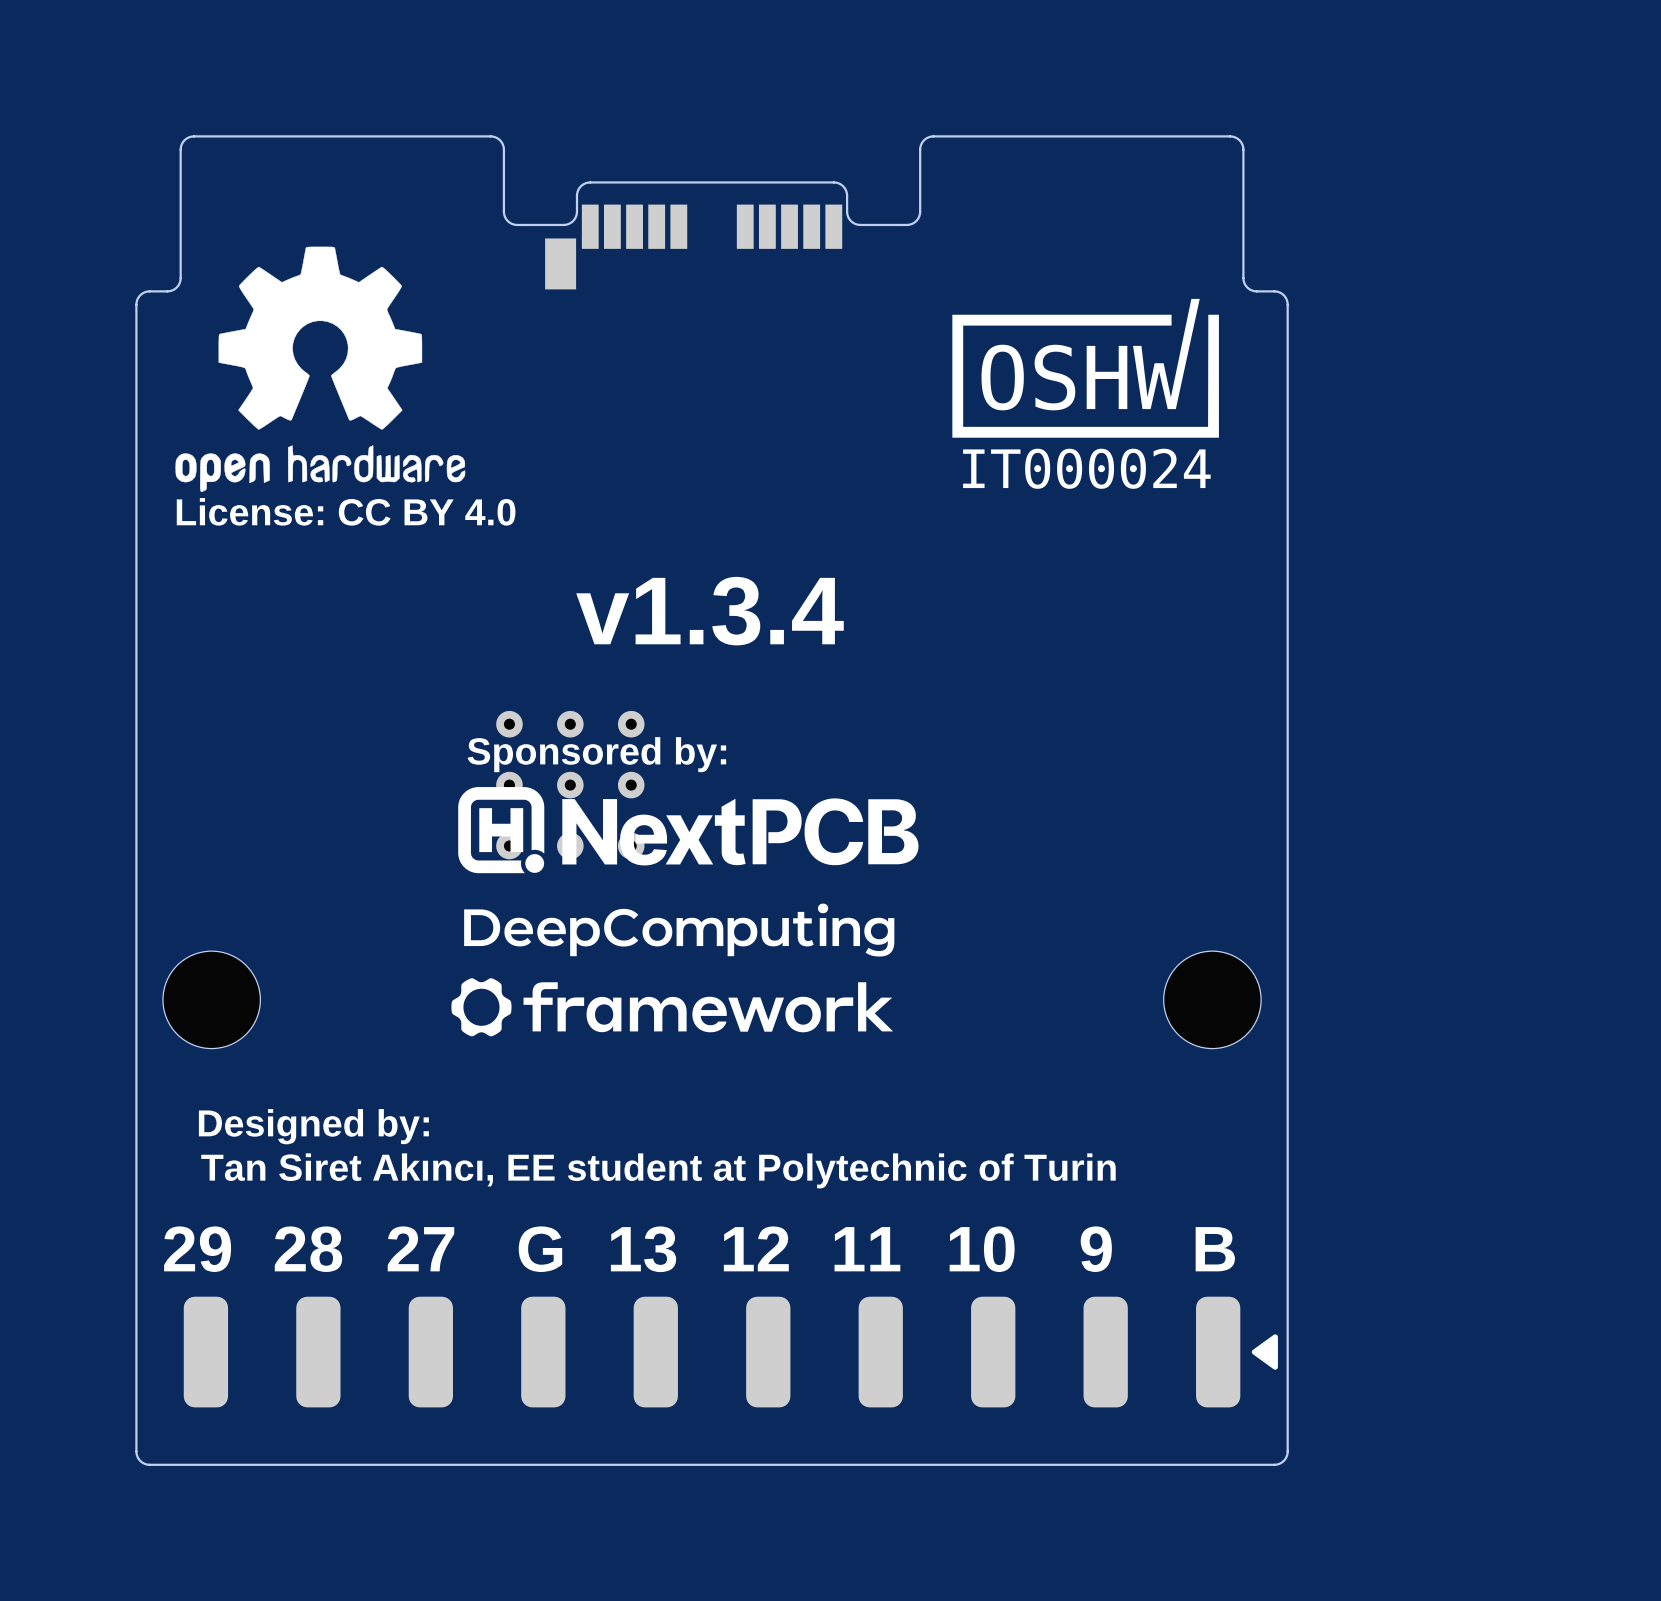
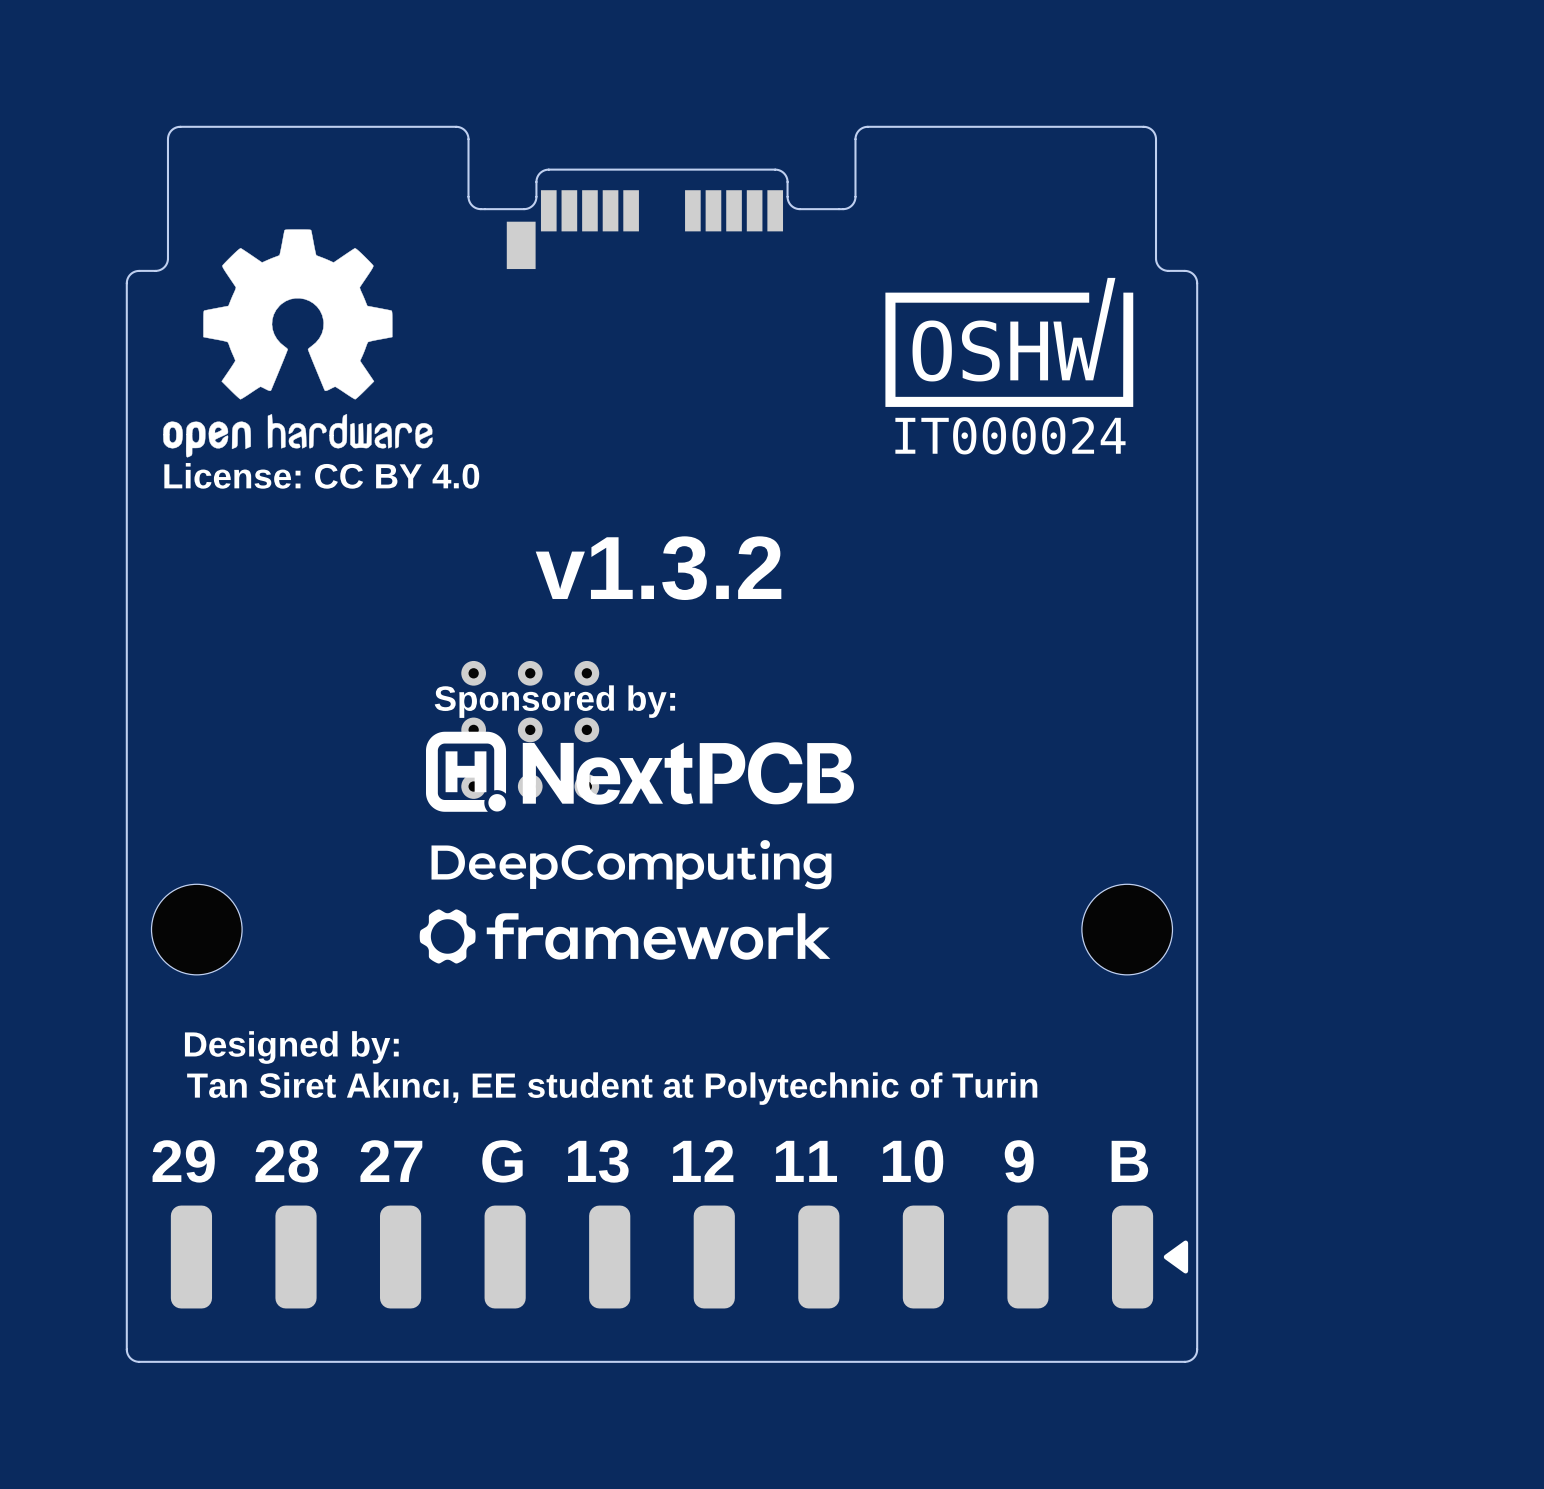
text: v1.3.4 (709, 611) -> v1.3.2 (658, 568)

